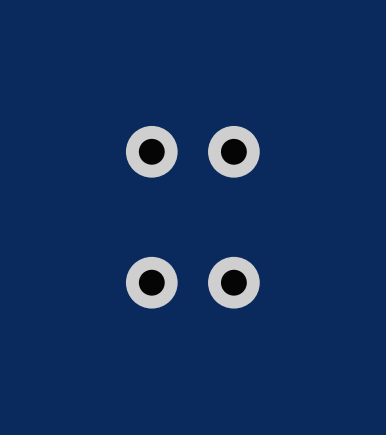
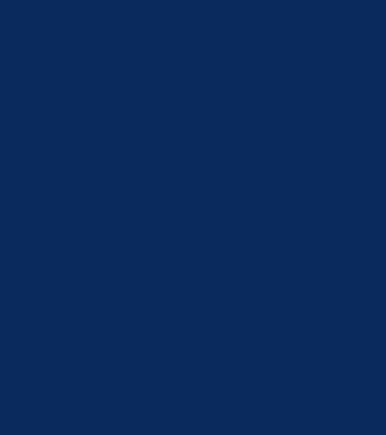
part: (192, 151) -> none
part: (192, 282) -> none

